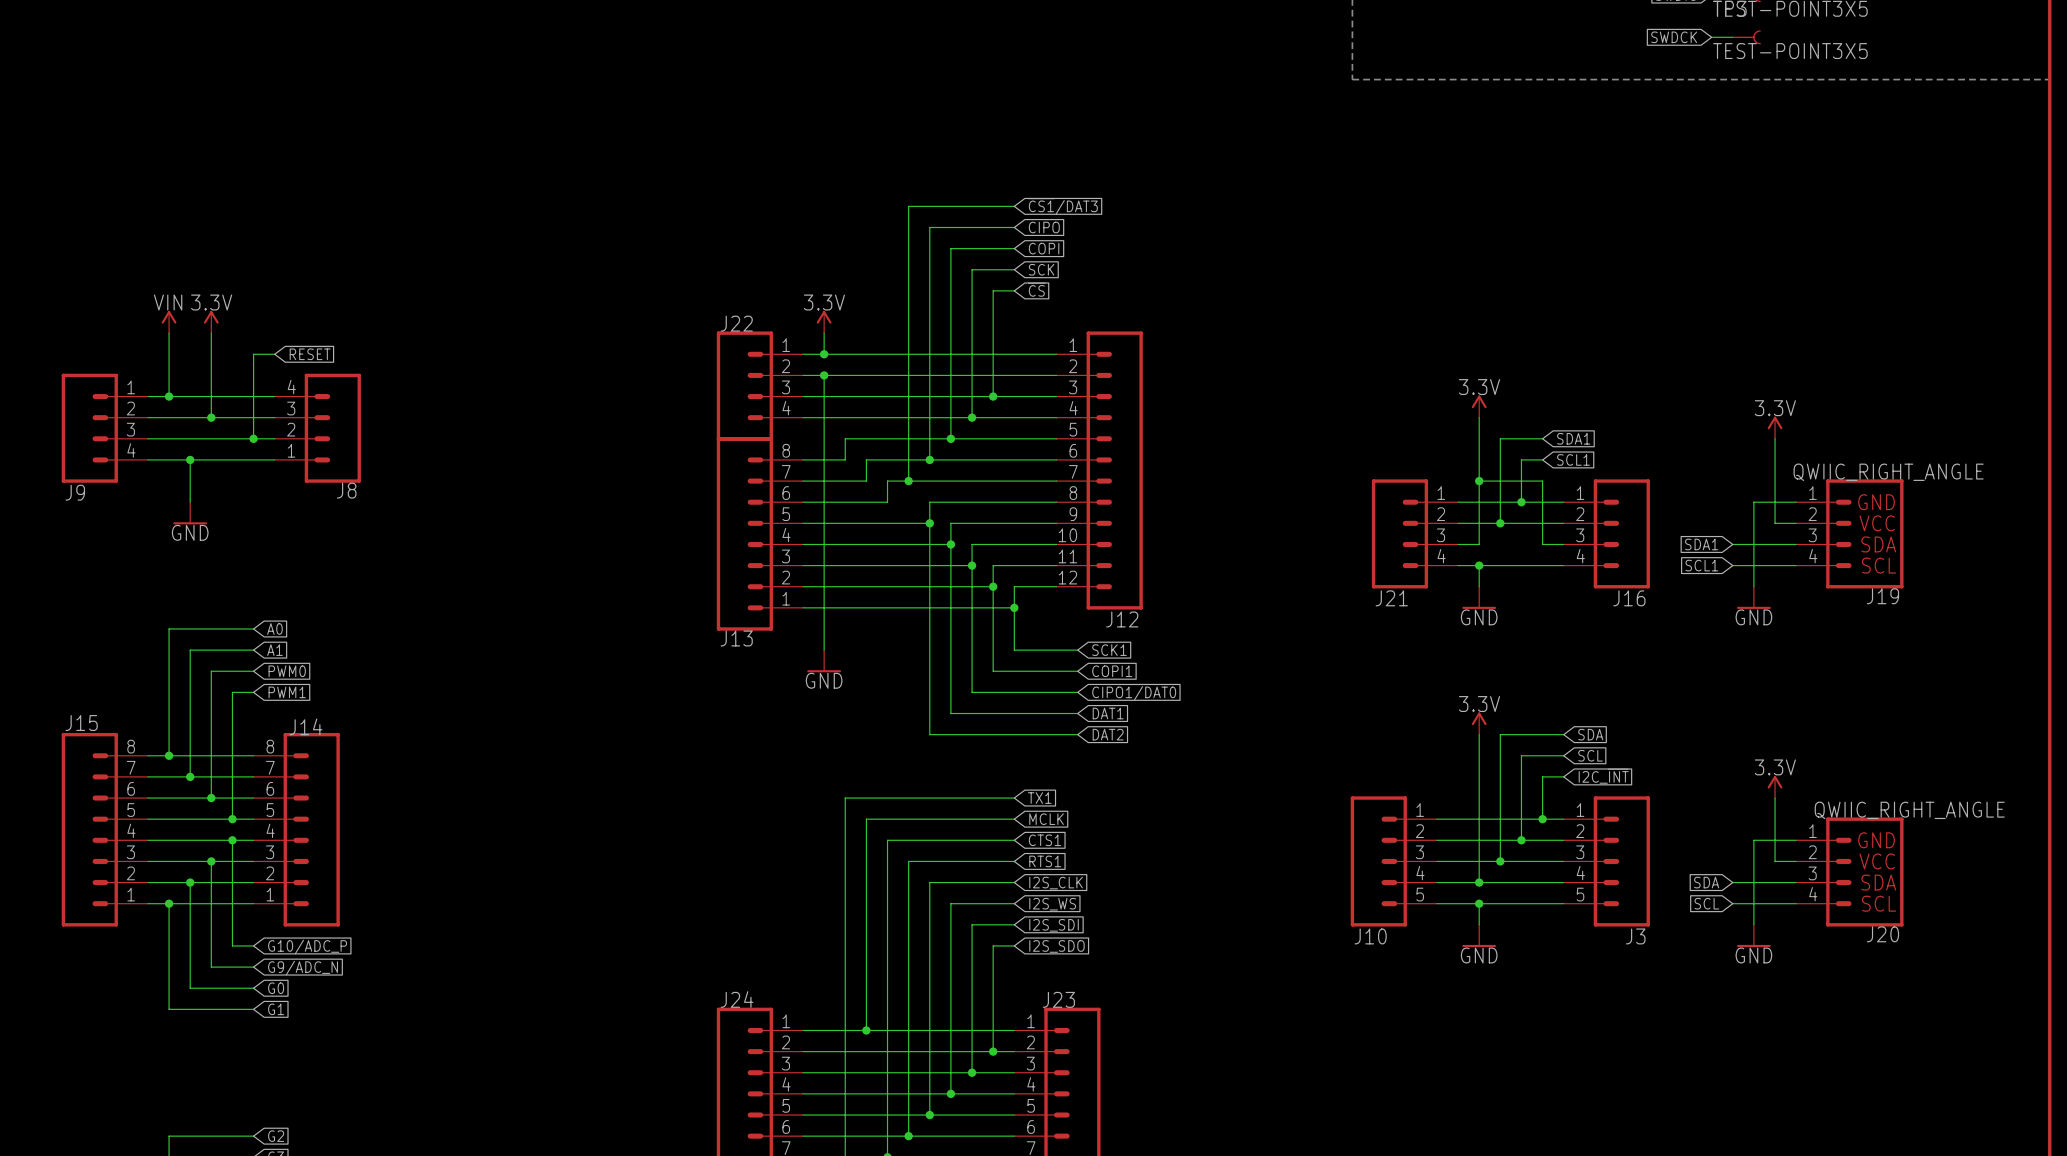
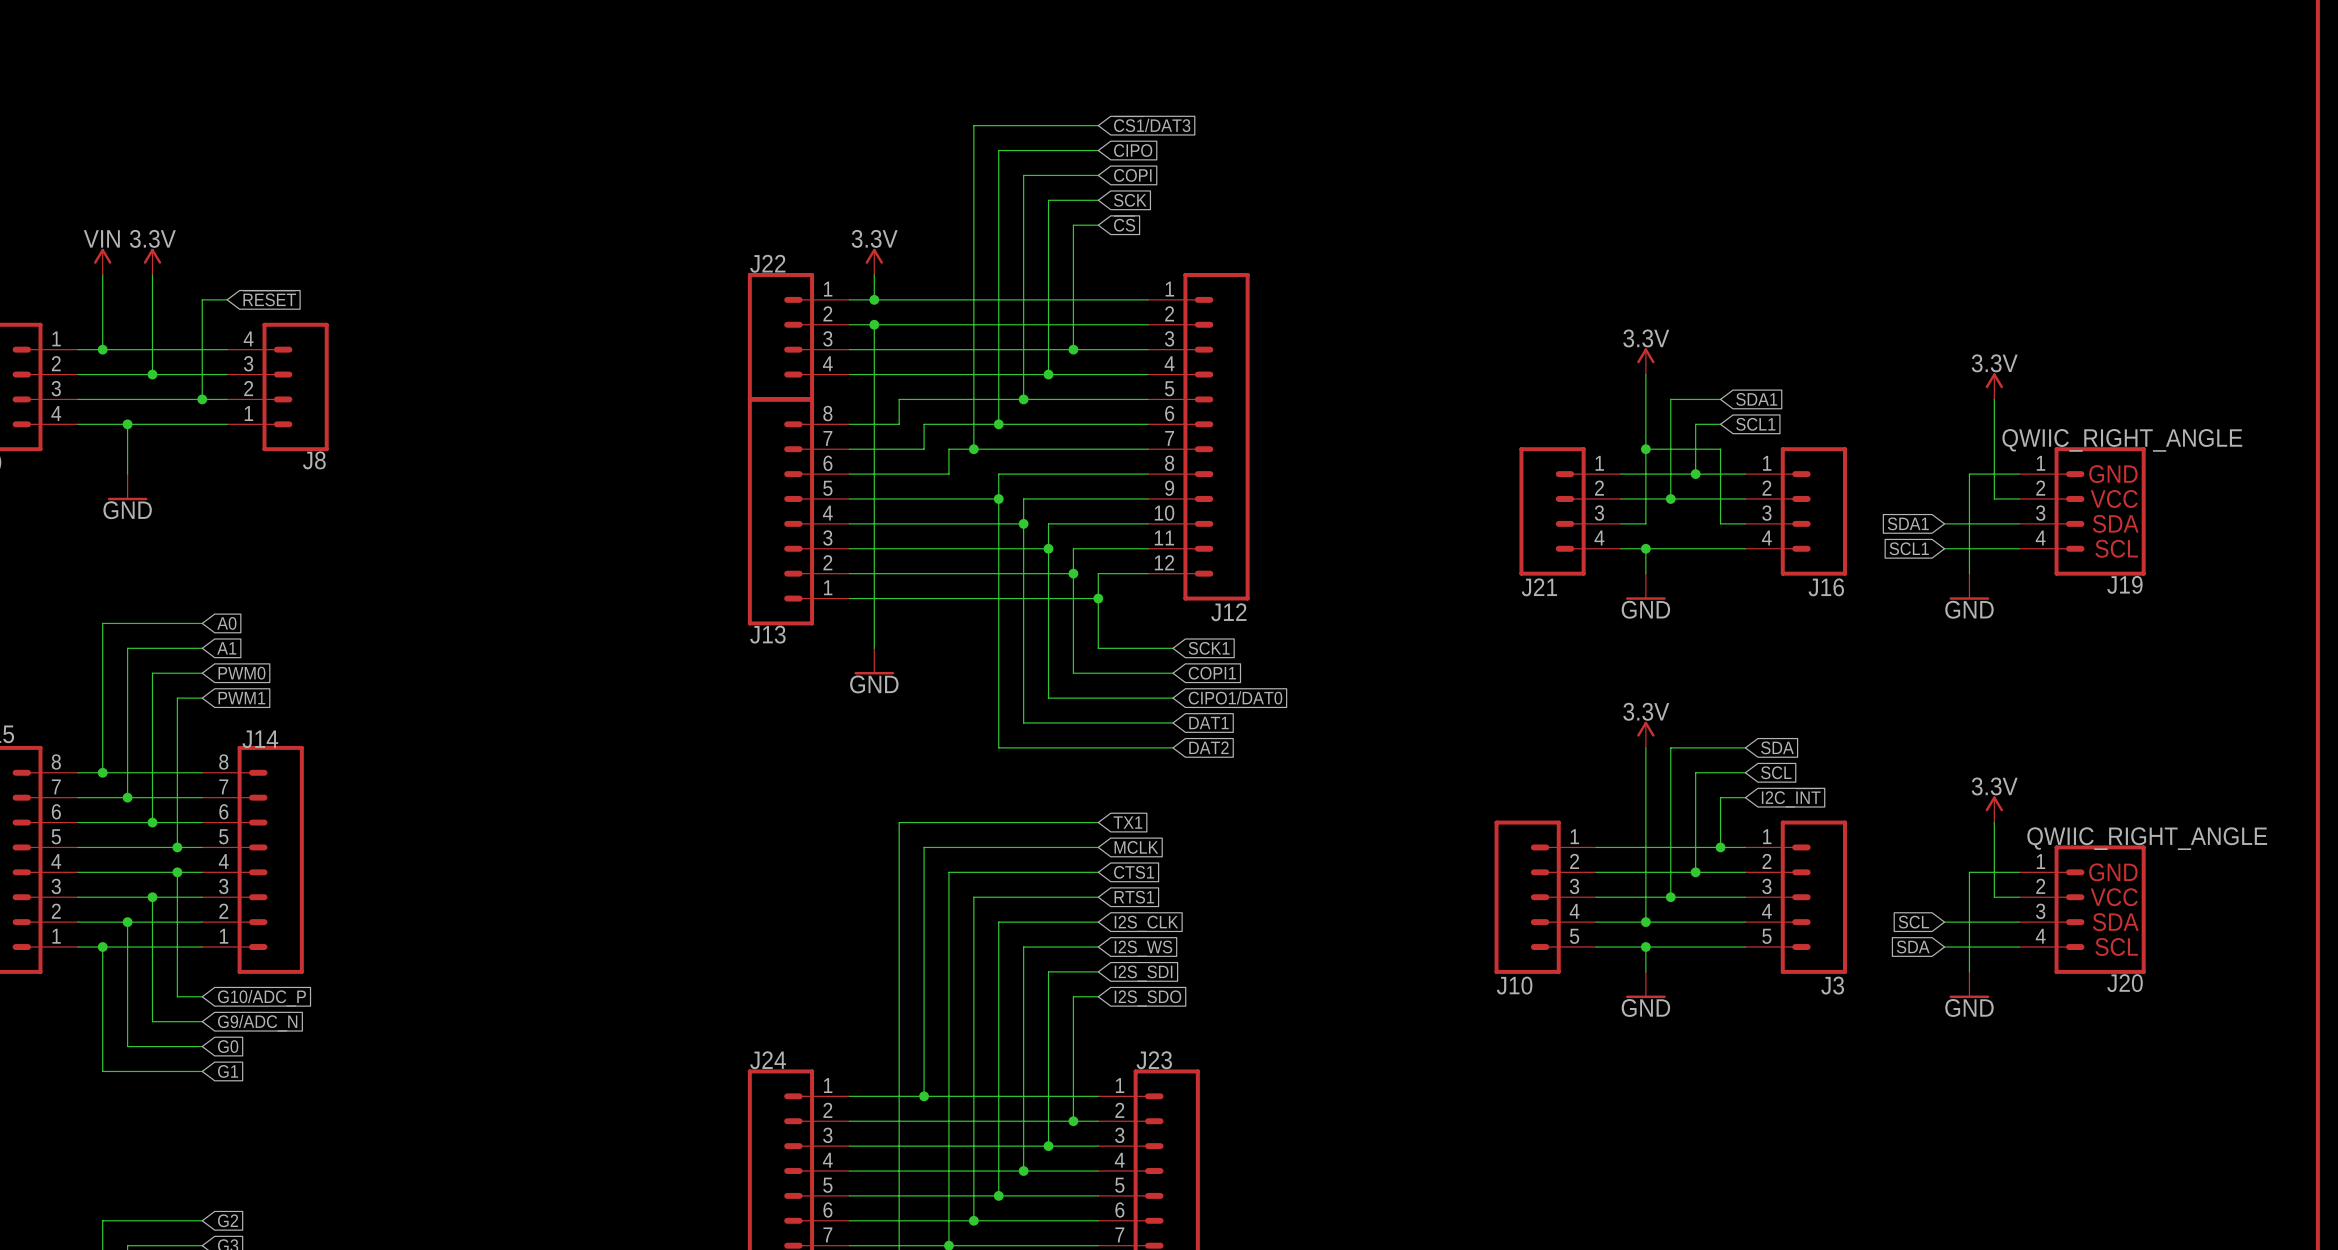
global label: SDA (1706, 882) -> SCL (1913, 922)
global label: SCL (1706, 903) -> SDA (1913, 947)

